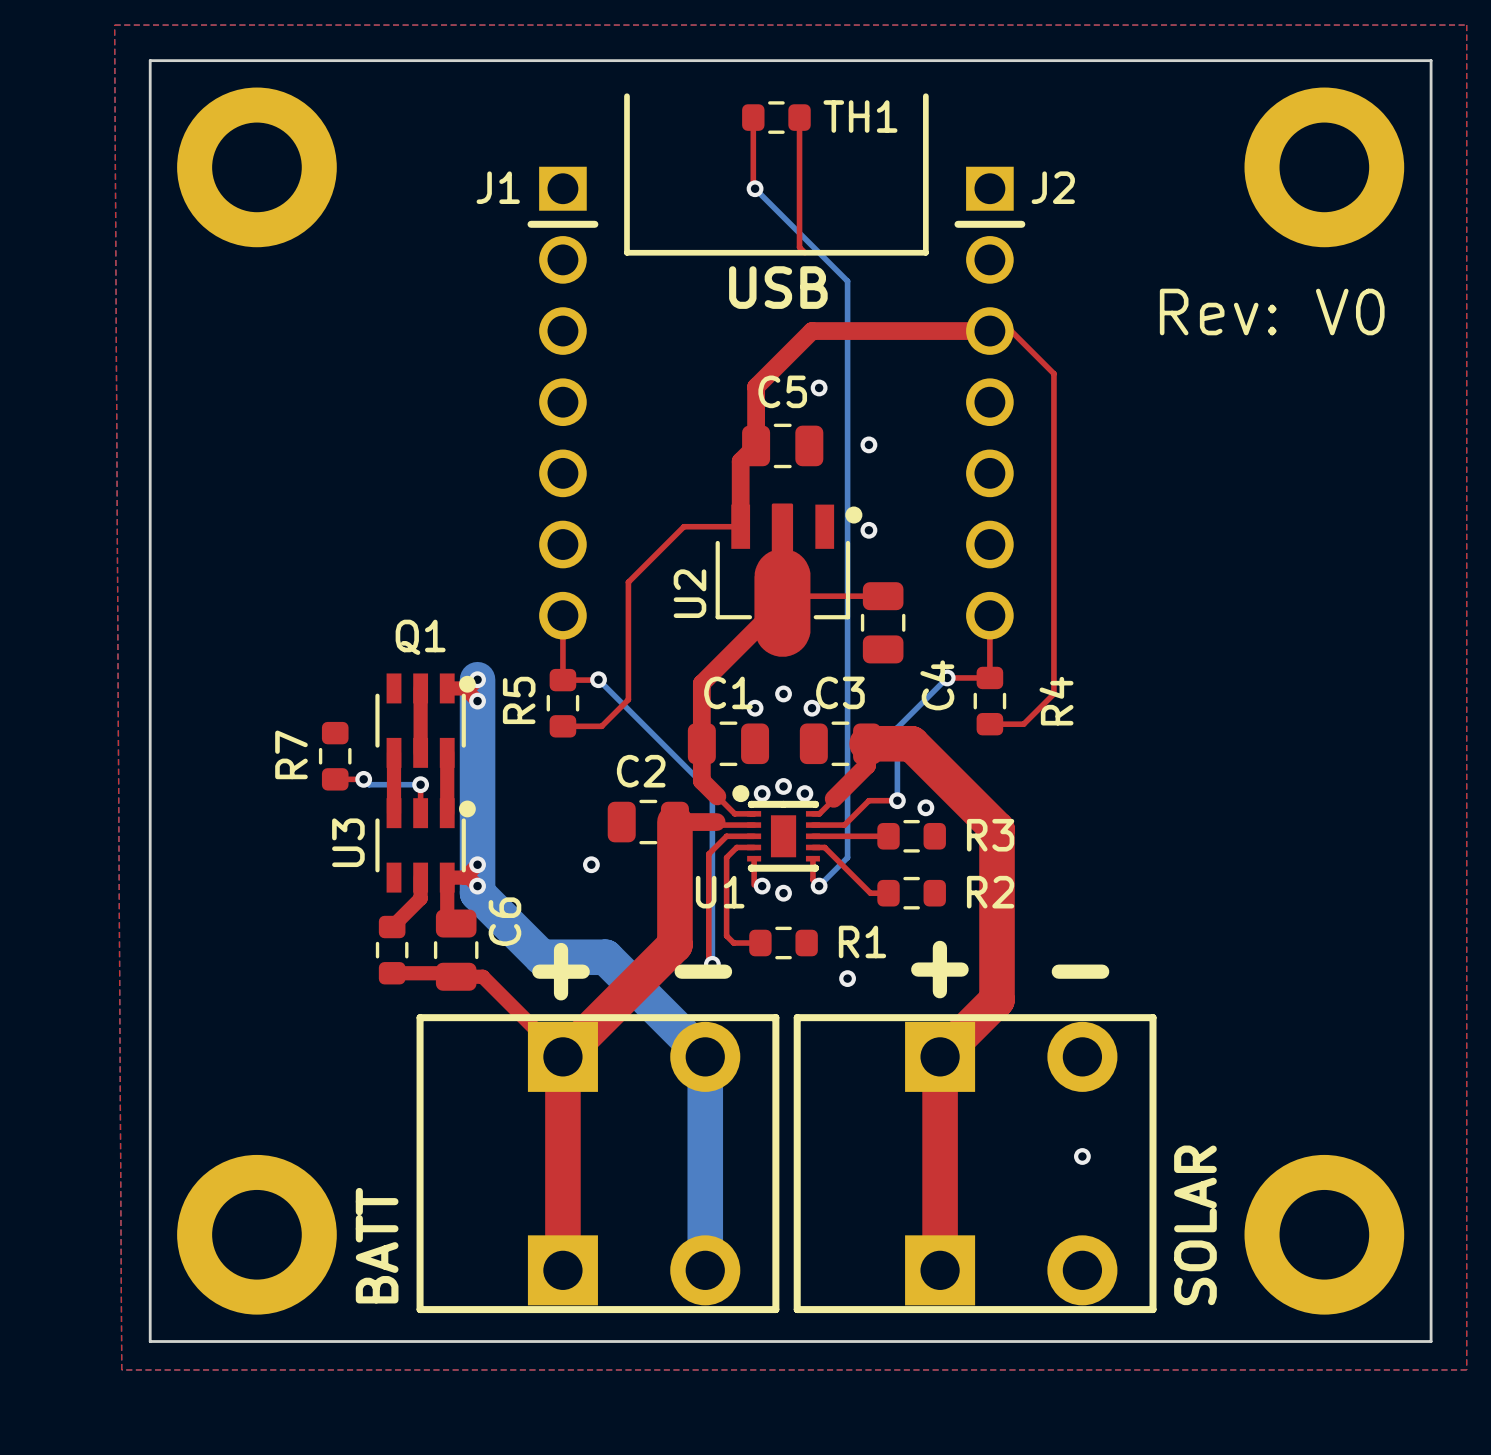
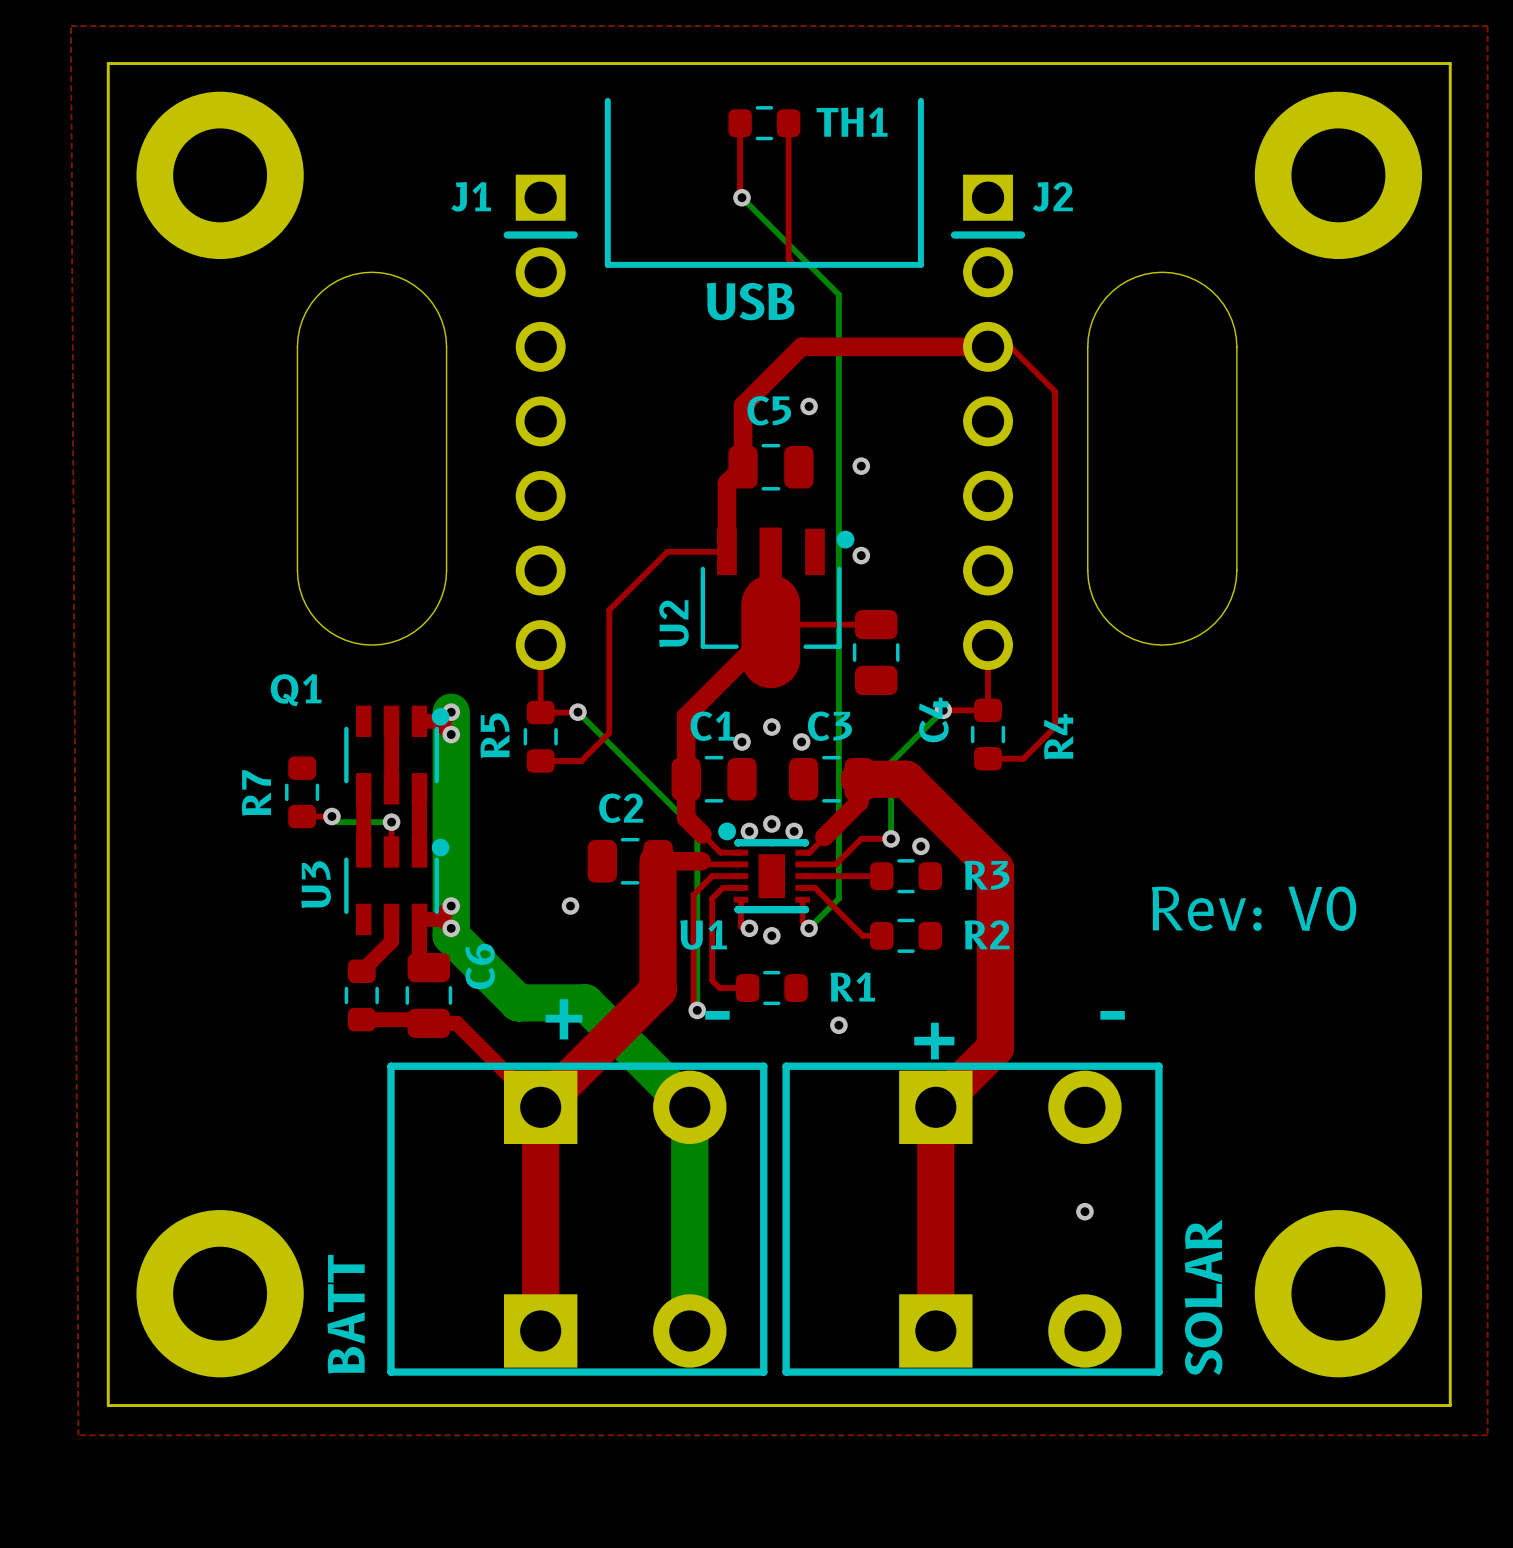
text position: Rev: V0 (1272, 312) -> Rev: V0 (1254, 908)
board edge: none -> (297, 346) (297, 570) (302, 596) (316, 619) (337, 636) (363, 644) (381, 644) (398, 640) (414, 631) (433, 612) (441, 596) (446, 579) (446, 346) (441, 320) (427, 297) (406, 280) (381, 272) (363, 272) (337, 280) (316, 297) (302, 320) (297, 346)
board edge: none -> (1087, 346) (1087, 570) (1090, 589) (1103, 615) (1125, 635) (1152, 644) (1181, 642) (1199, 635) (1215, 623) (1231, 599) (1236, 580) (1236, 346) (1232, 320) (1218, 297) (1196, 280) (1171, 272) (1153, 272) (1127, 280) (1106, 297) (1092, 320) (1087, 346)
Q1 name position: Q1 (420, 637) -> Q1 (296, 690)

